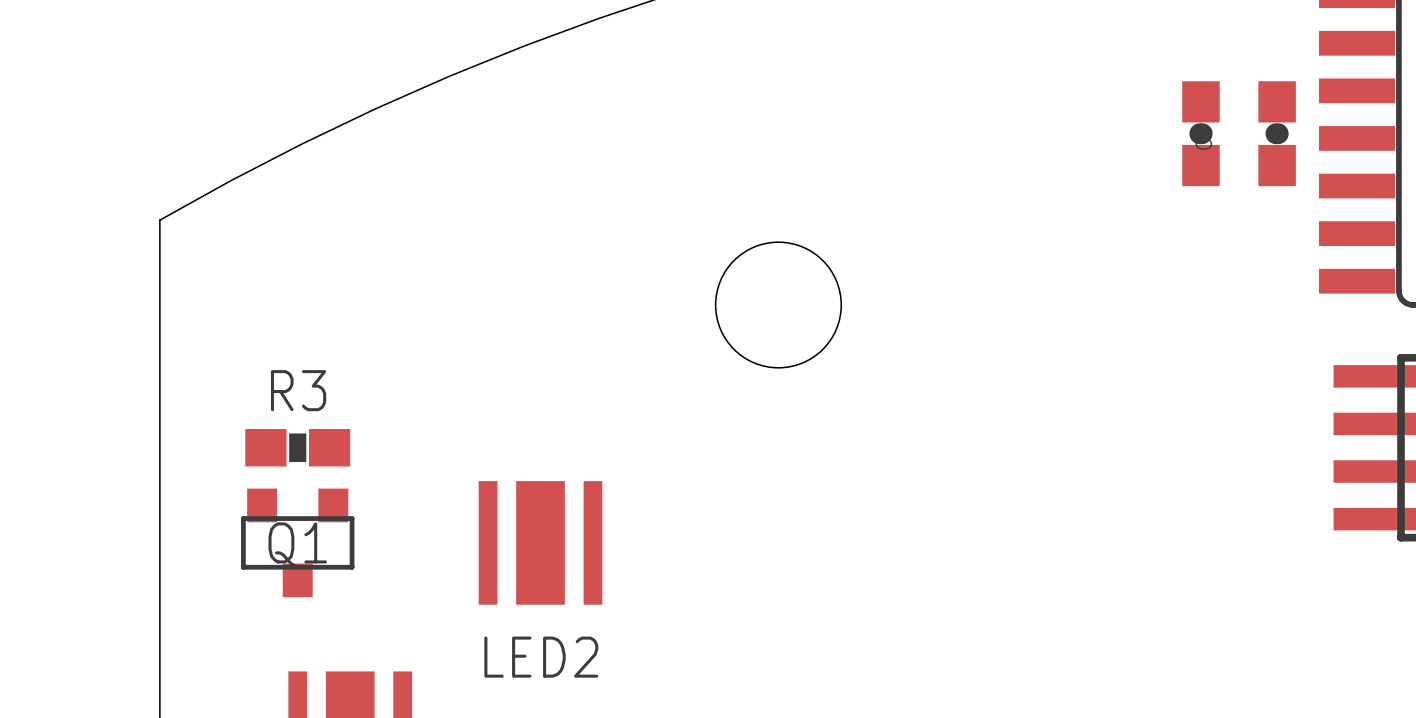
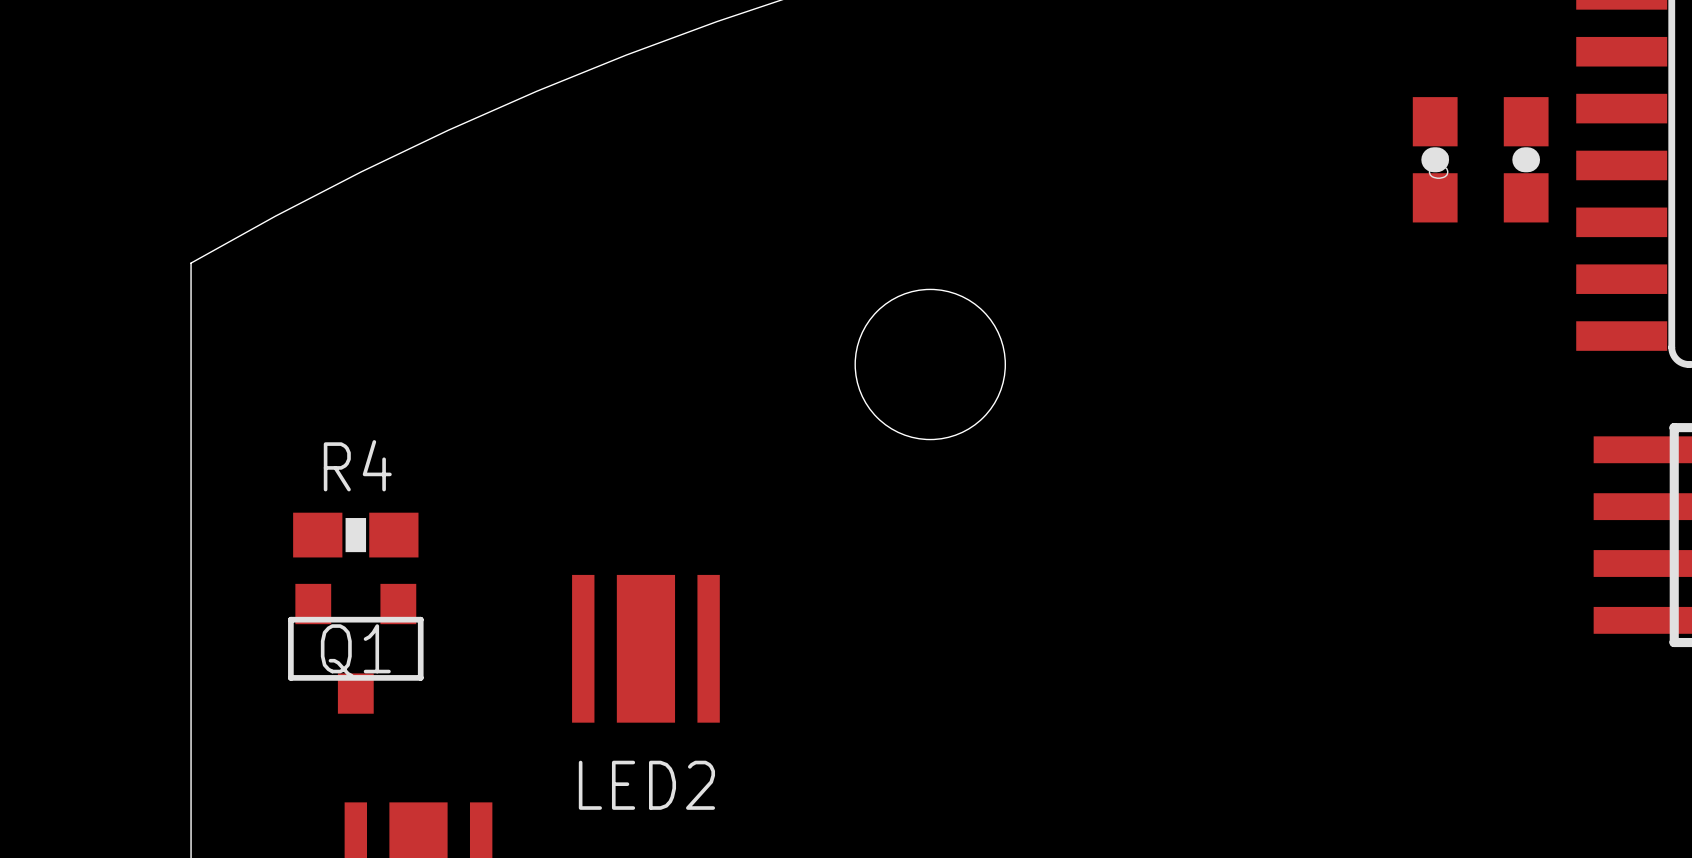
R4 name: none -> R4 (357, 465)
R3: (298, 390) -> none

